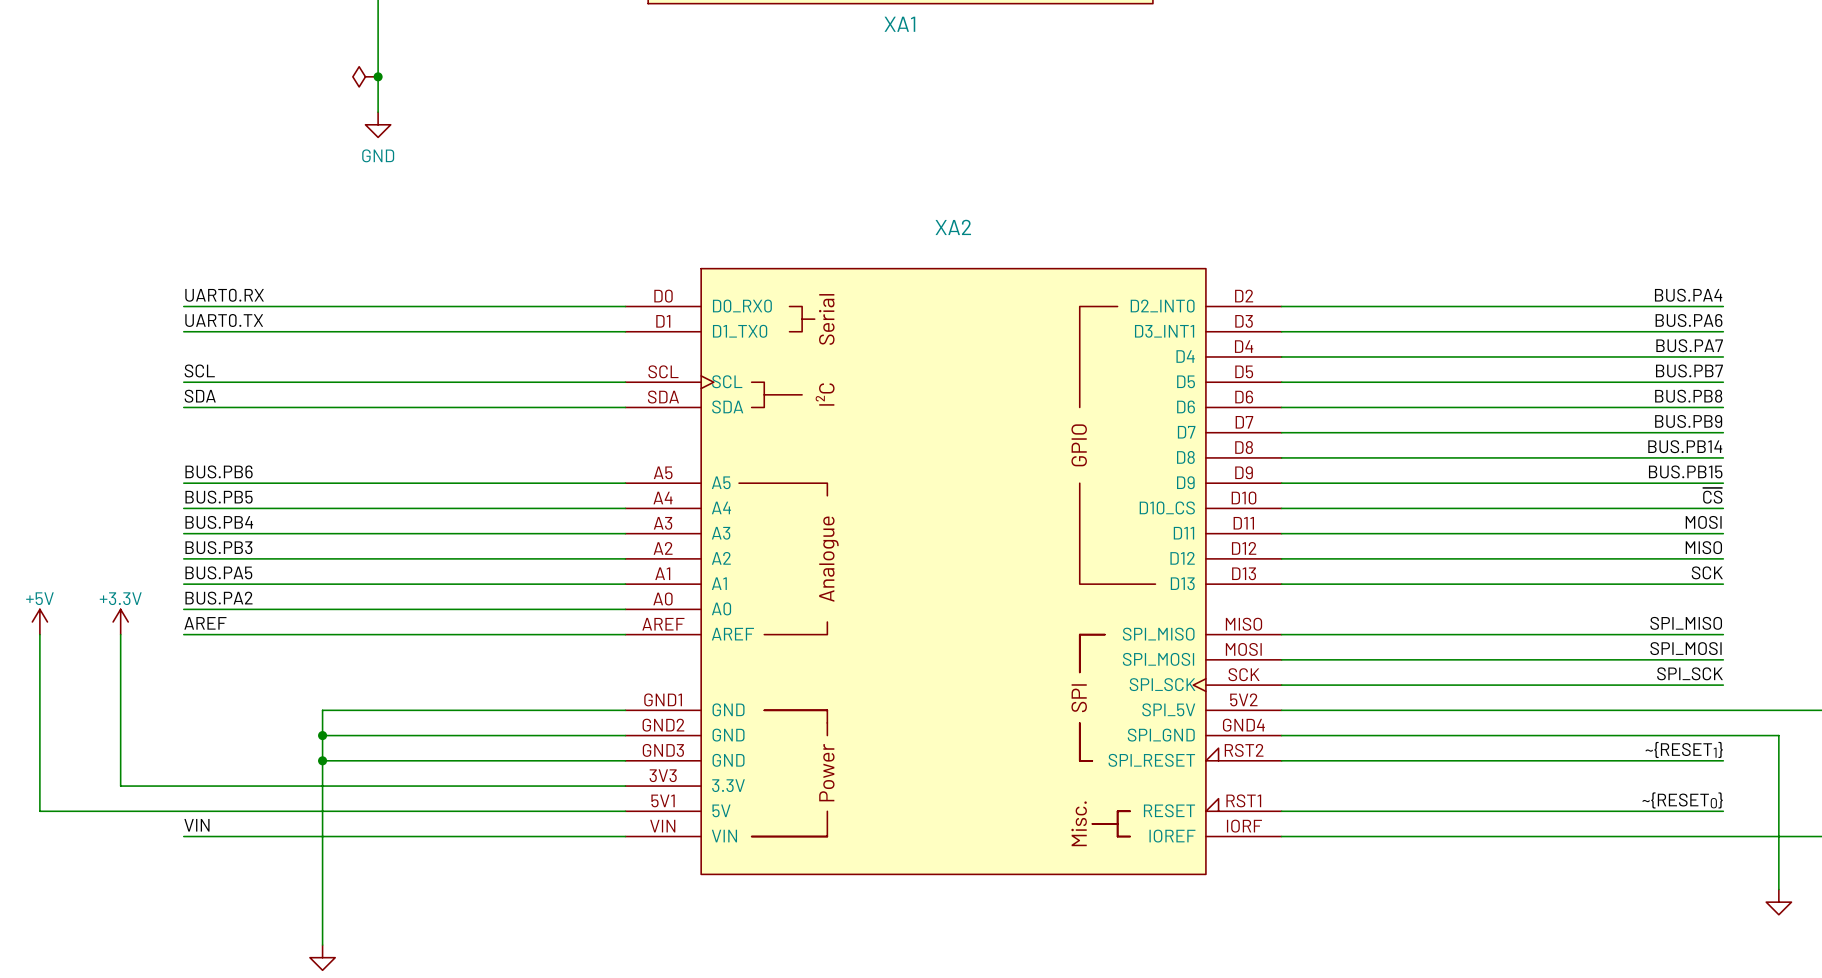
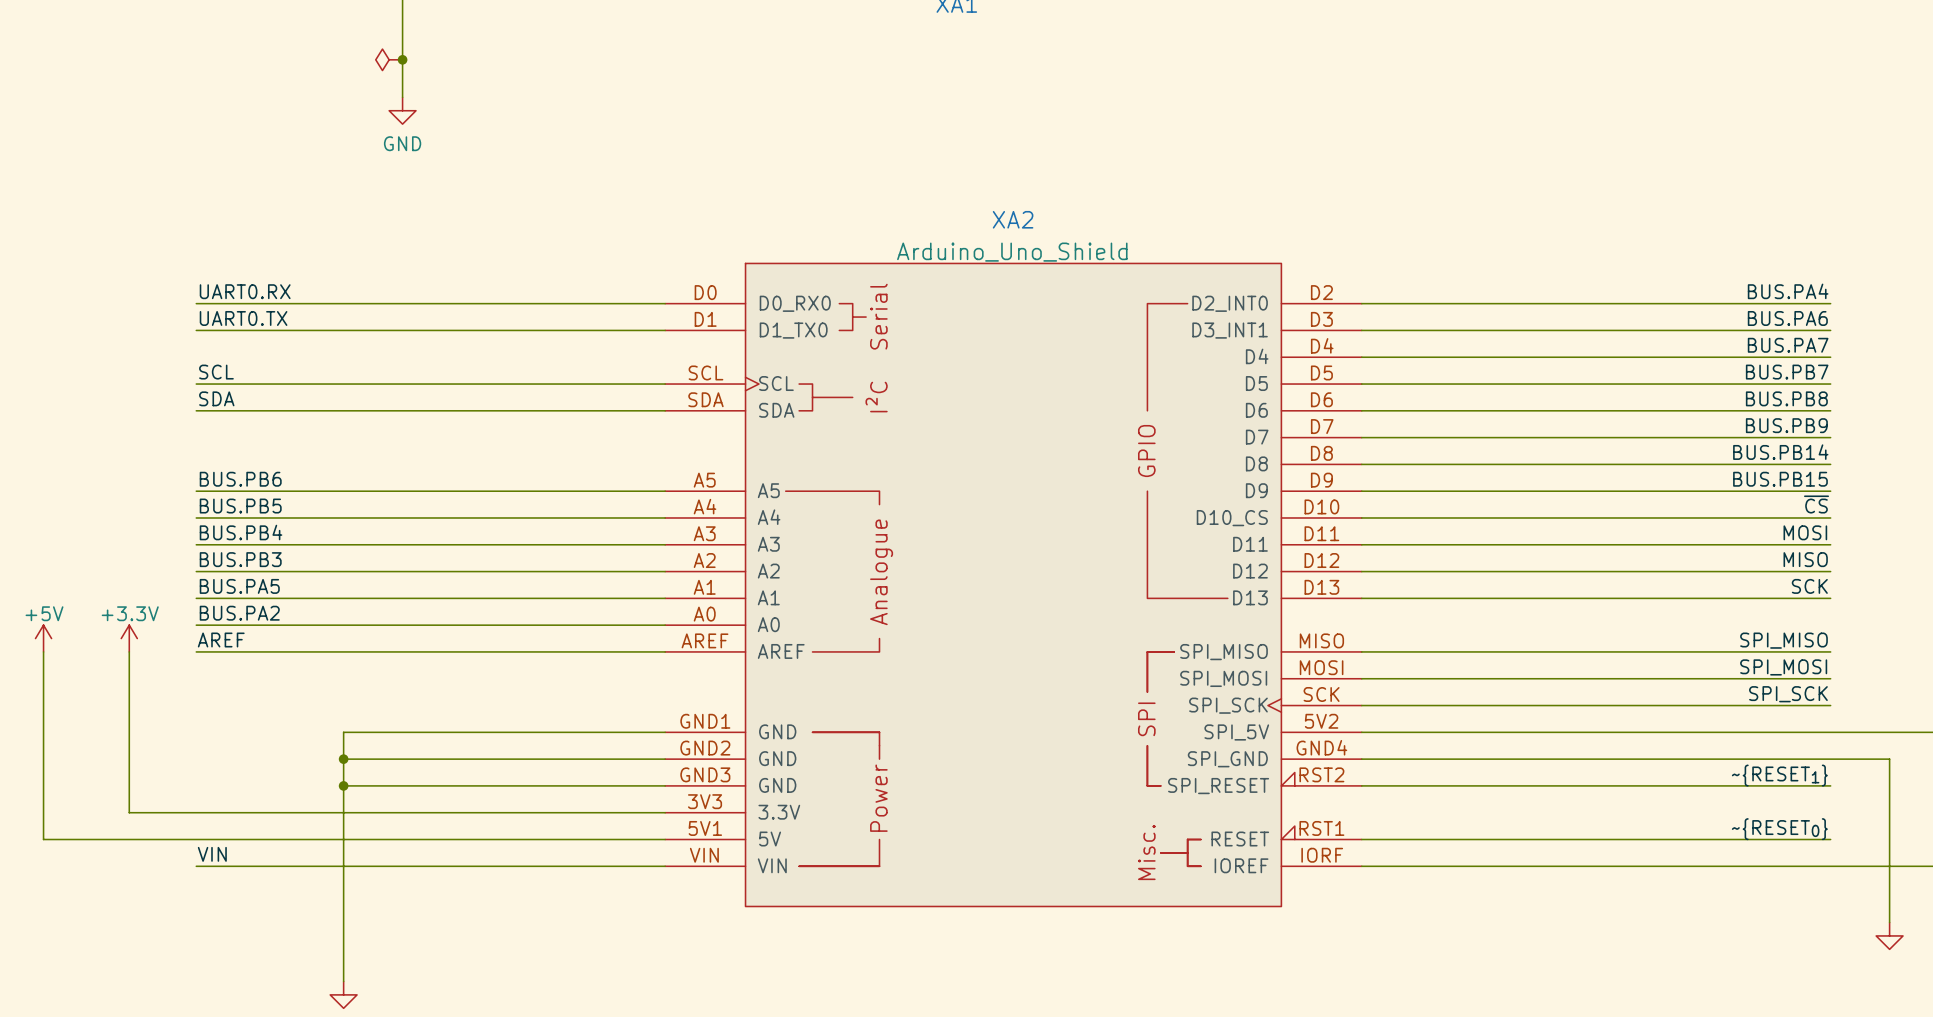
XA2 value: none -> Arduino_Uno_Shield (1012, 252)

